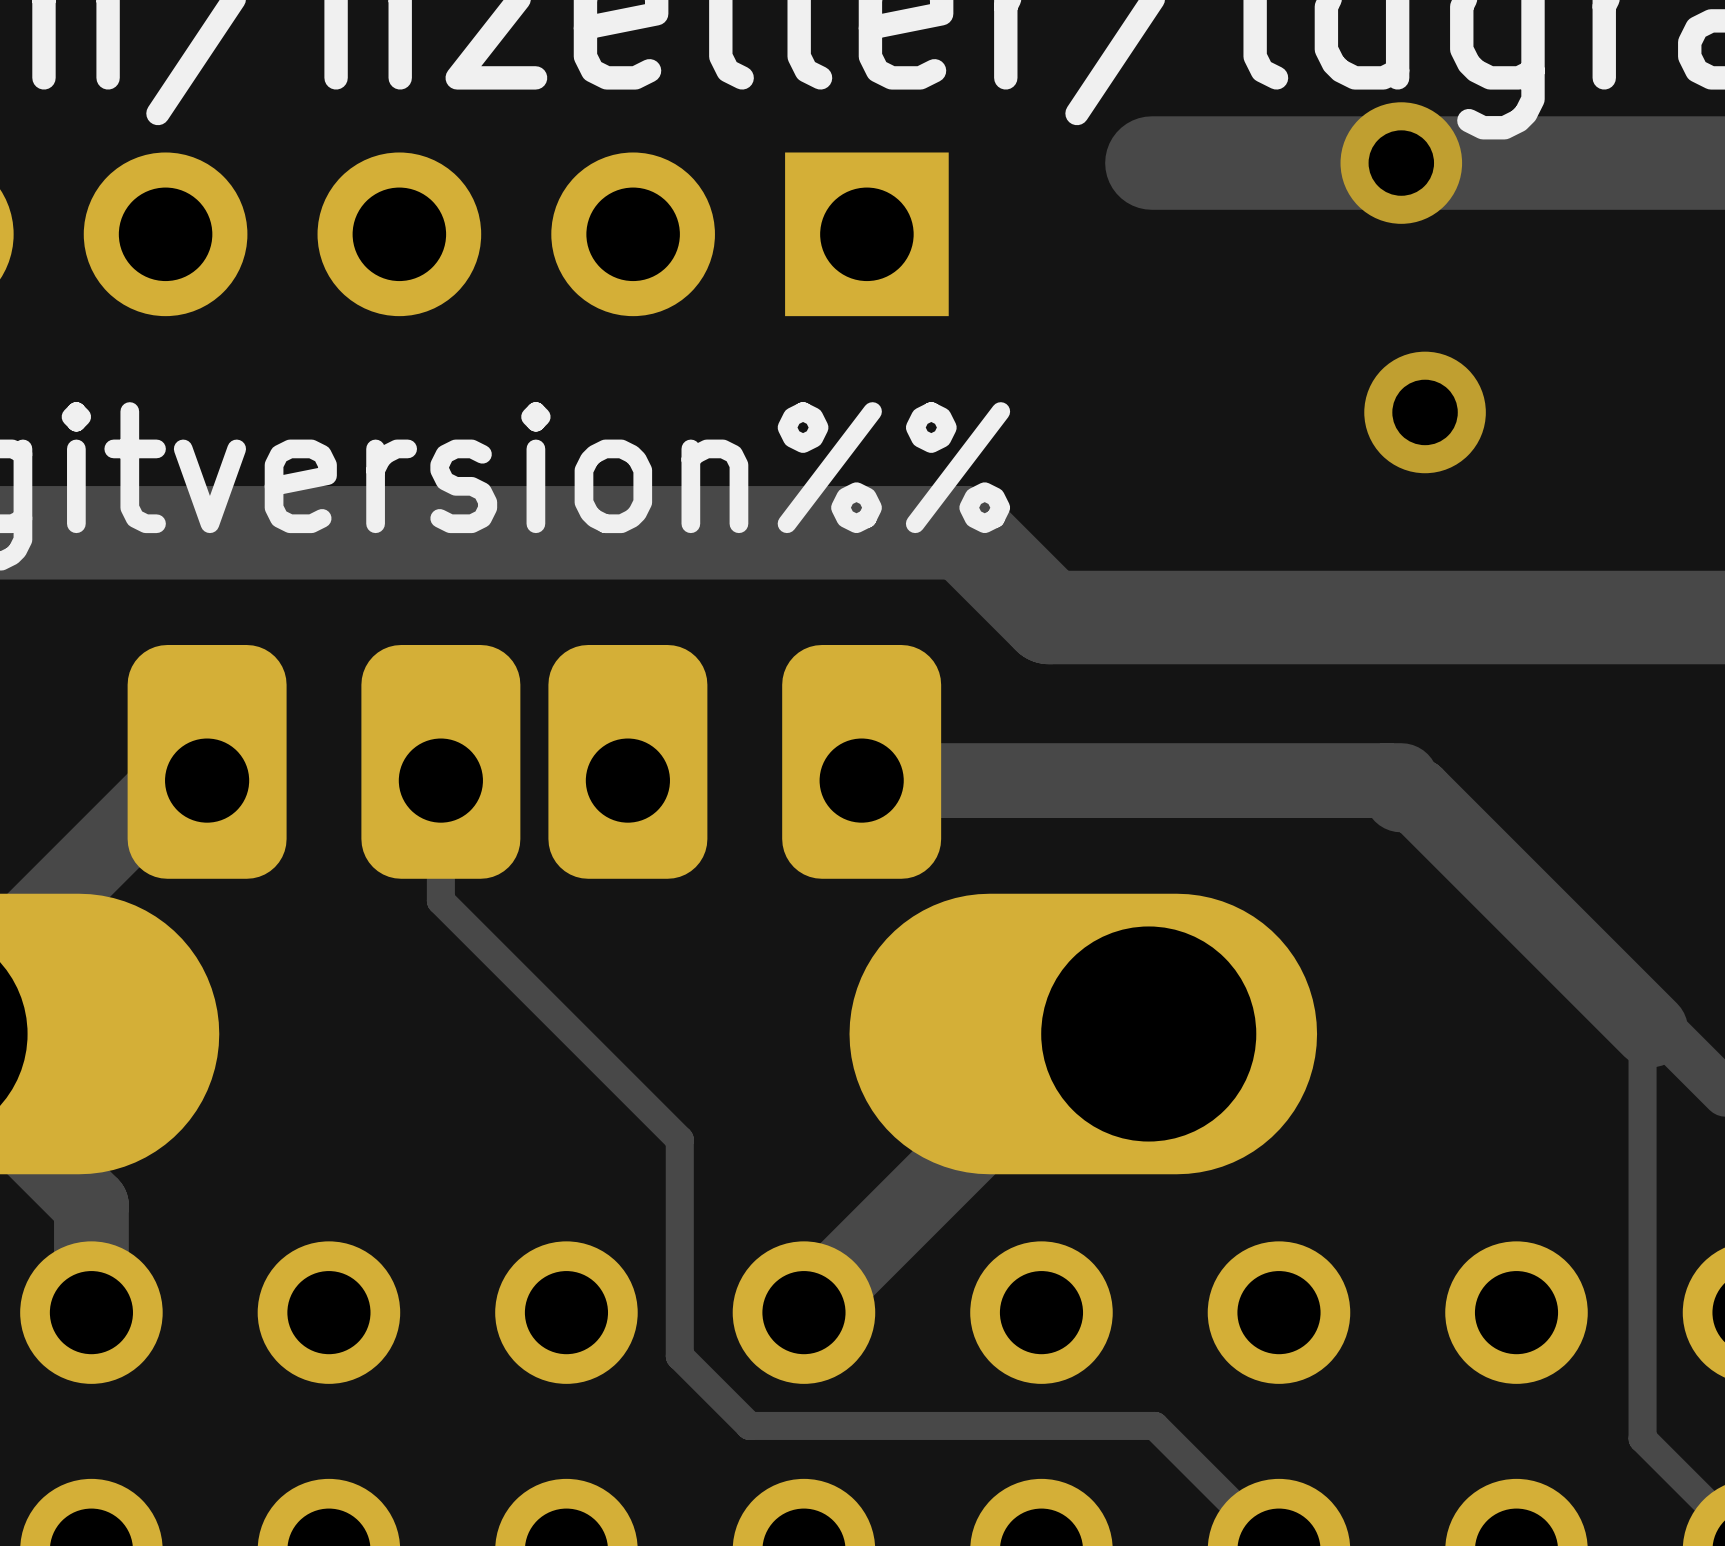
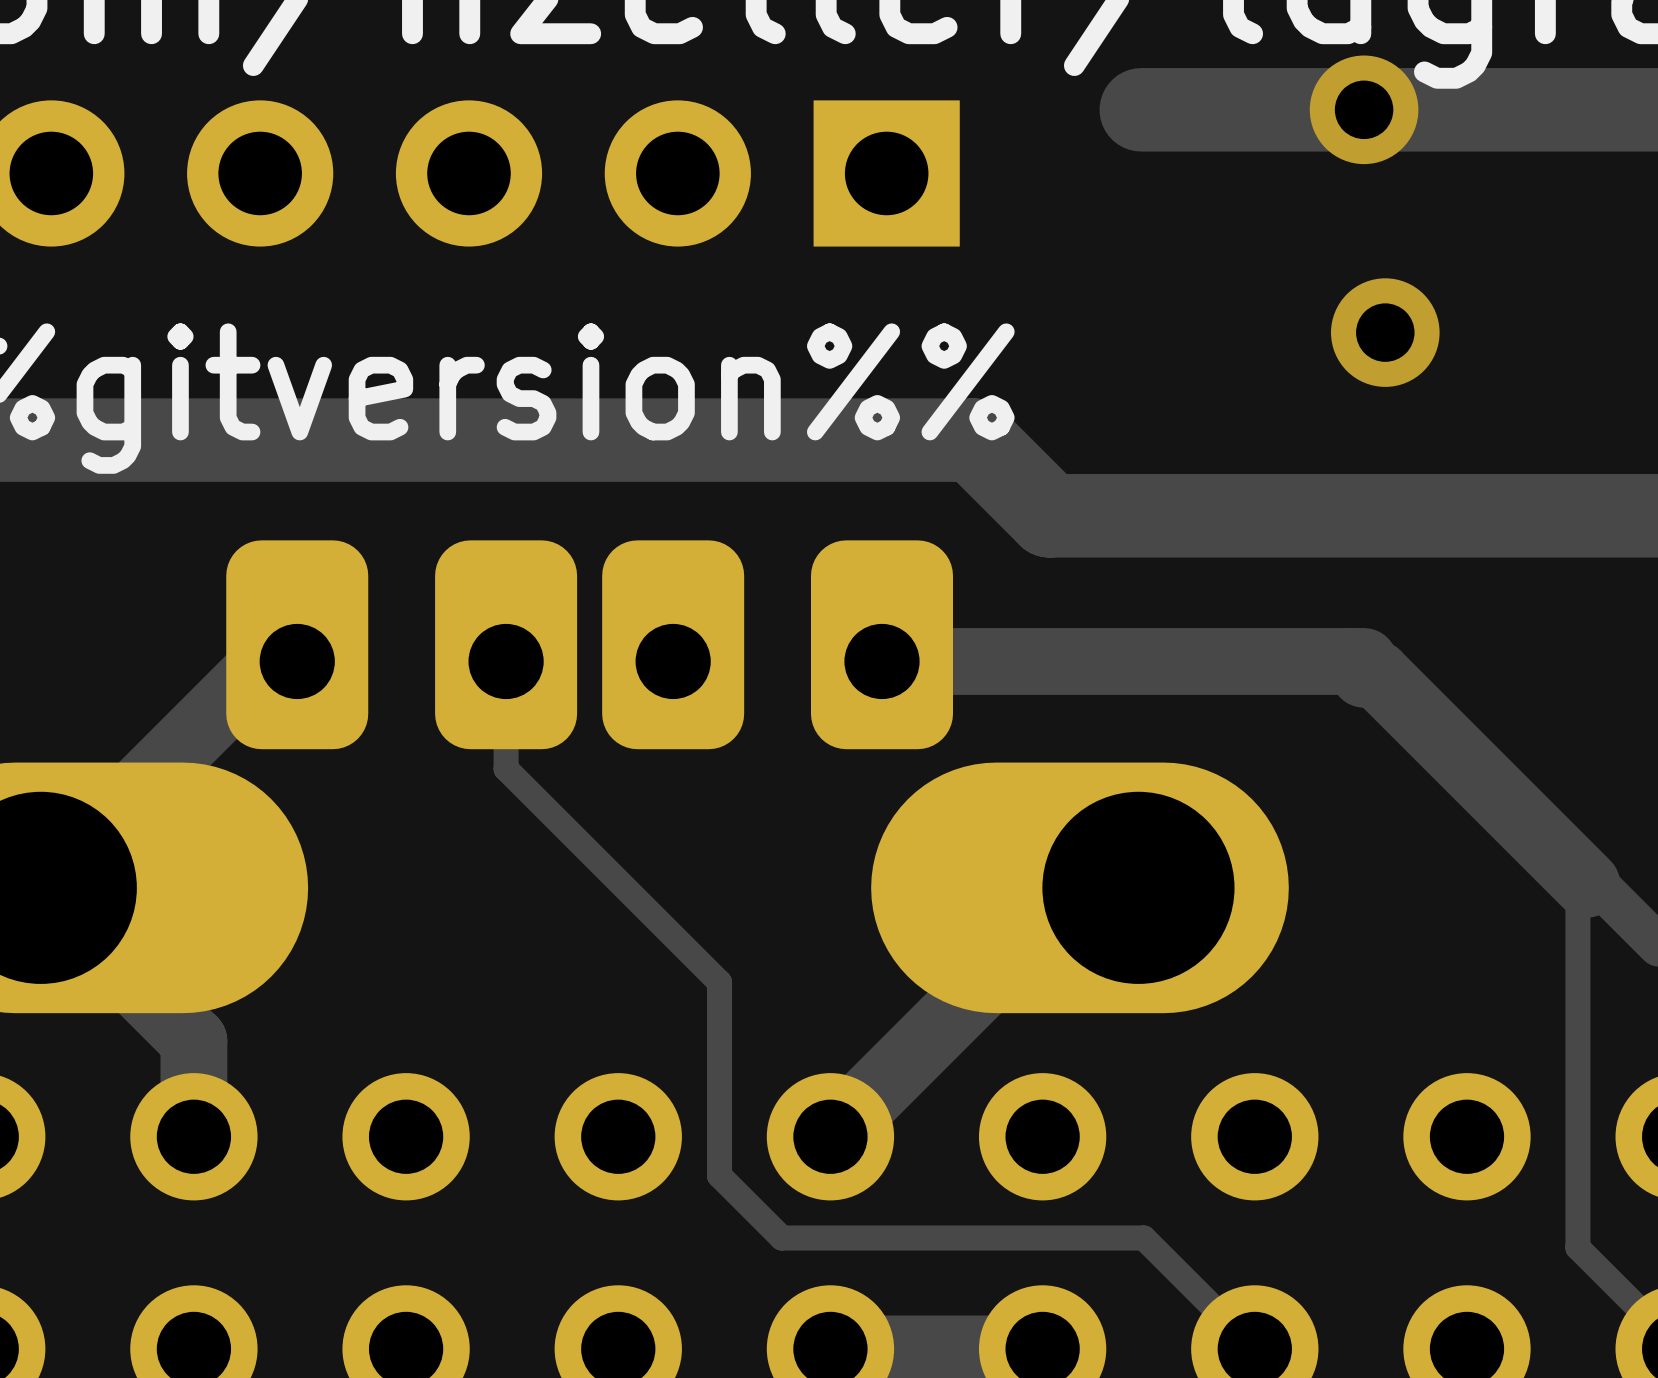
track: (1642, 1036) (1642, 1438) -> (1597, 884) (1577, 903) (1577, 1247) (1579, 1249)

